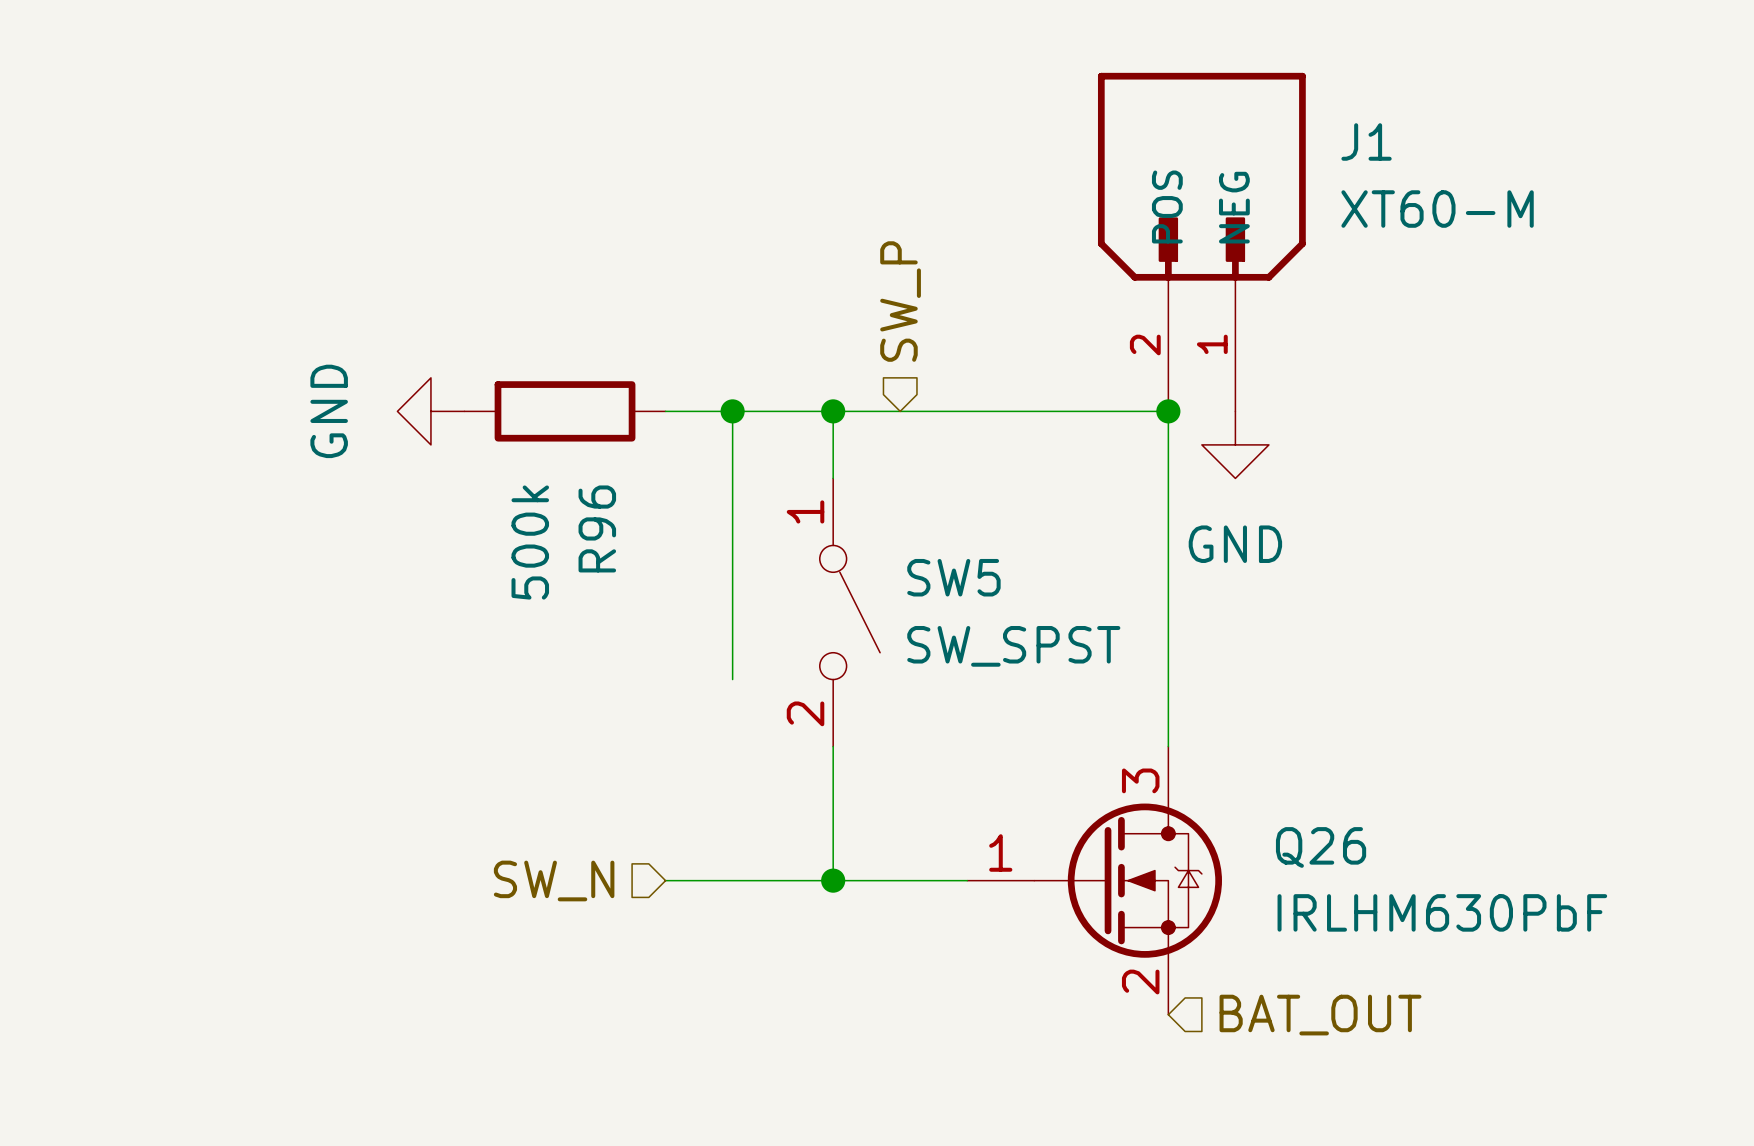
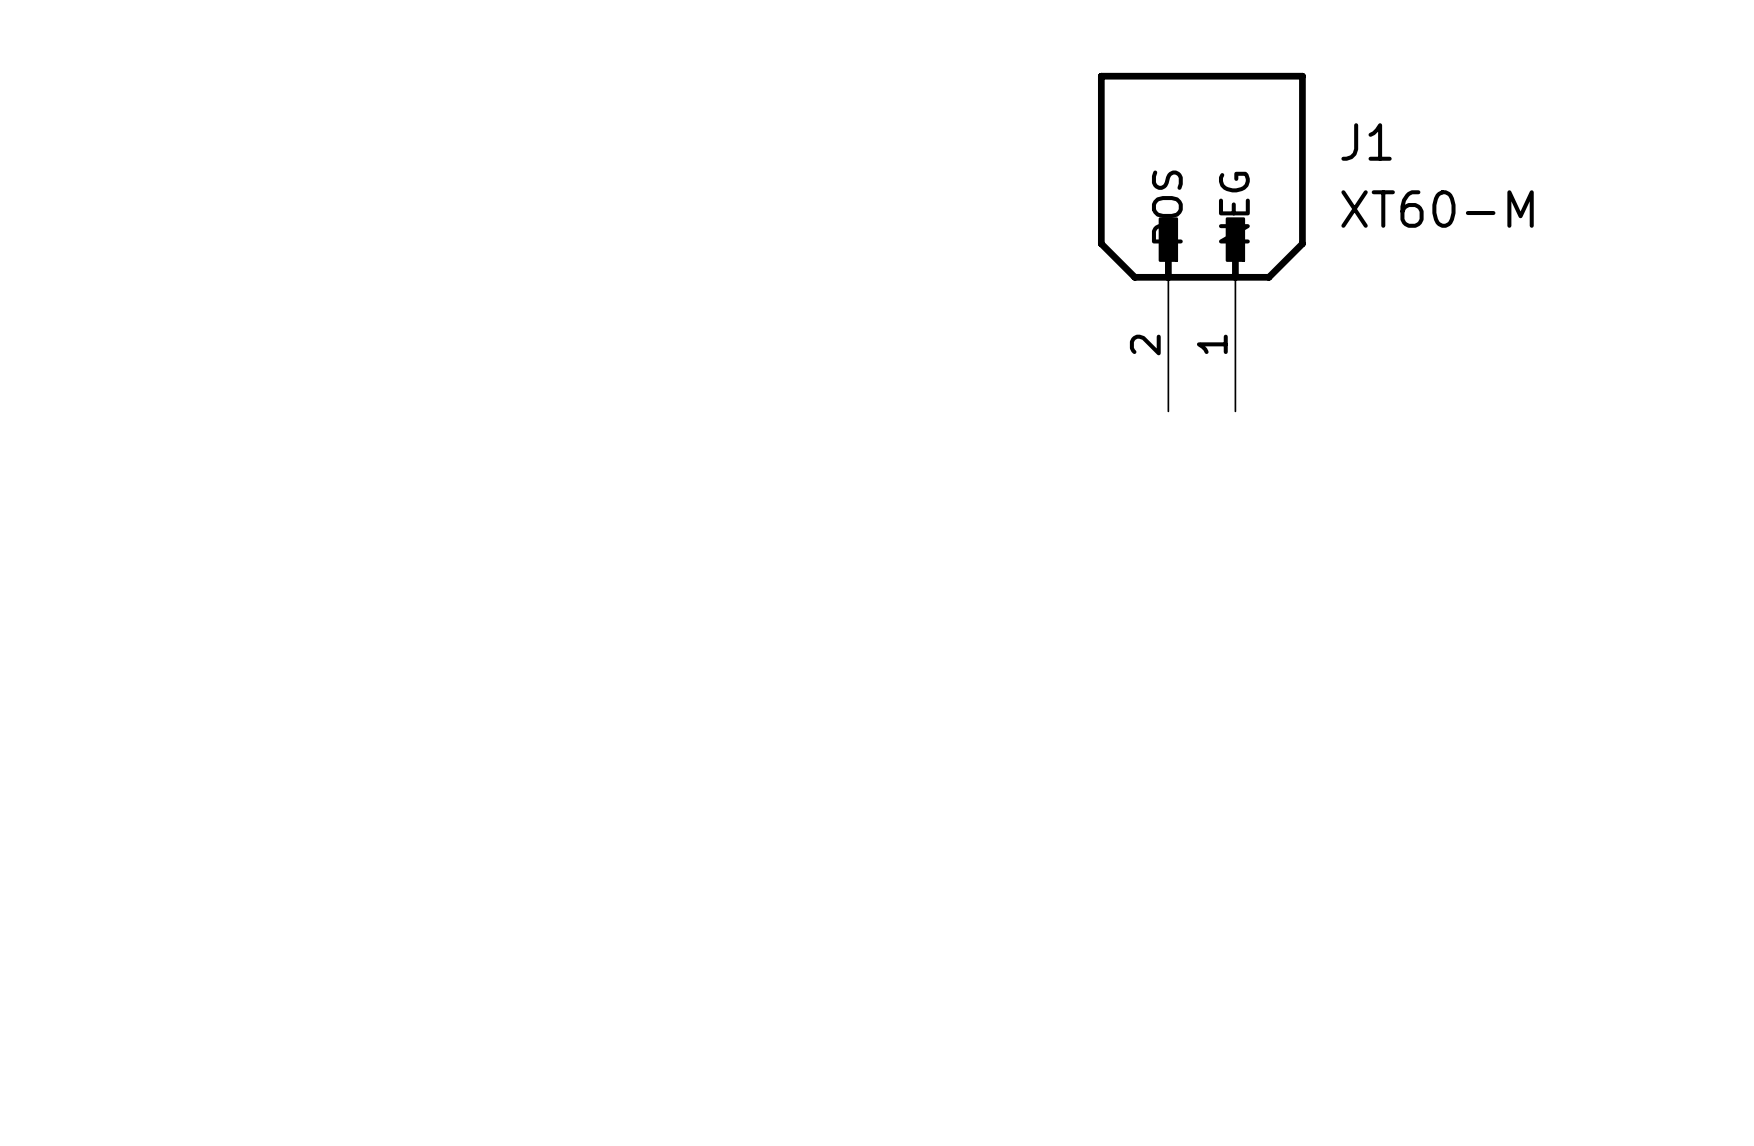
hierarchical label: SW_P (900, 301) -> none
power symbol: GND (430, 411) -> none
R96: 500k (565, 411) -> none
wire: (665, 411) (1168, 411) (1168, 746) -> none
wire: (732, 411) (732, 679) -> none
junction: (732, 411) -> none
wire: (833, 411) (833, 478) -> none
junction: (833, 411) -> none
junction: (1168, 411) -> none
power symbol: GND (1235, 444) -> none
SW5: SW_SPST (849, 612) -> none
wire: (833, 746) (833, 880) -> none
hierarchical label: SW_N (554, 880) -> none
wire: (665, 880) (967, 880) -> none
junction: (833, 880) -> none
Q26: IRLHM630PbF (1094, 880) -> none
hierarchical label: BAT_OUT (1320, 1015) -> none

